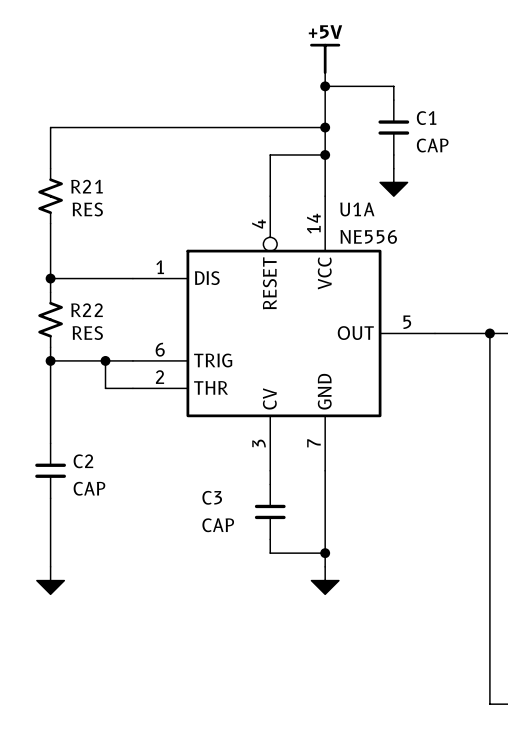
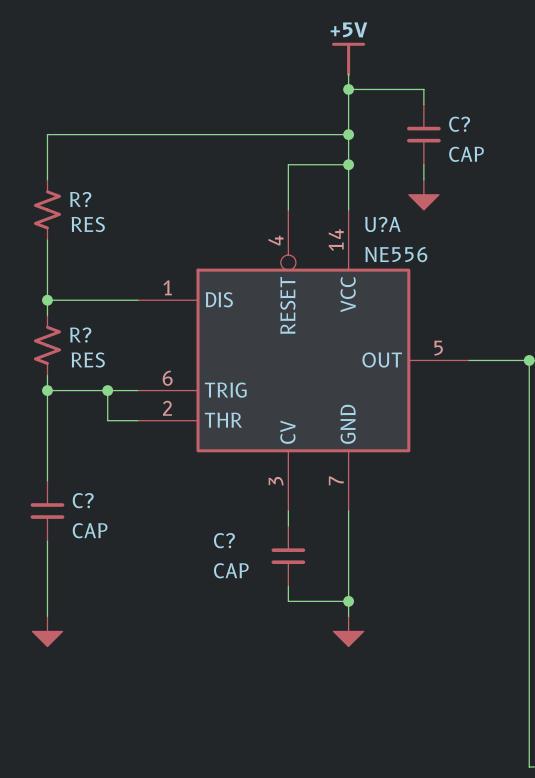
C1 name: C1 (426, 118) -> C? (459, 124)
R21 name: R21 (86, 186) -> R? (80, 199)
U1A name: U1A (357, 209) -> U?A (382, 224)
R22 name: R22 (87, 310) -> R? (80, 335)
C2 name: C2 (83, 461) -> C? (83, 500)
C3 name: C3 (212, 497) -> C? (224, 540)

